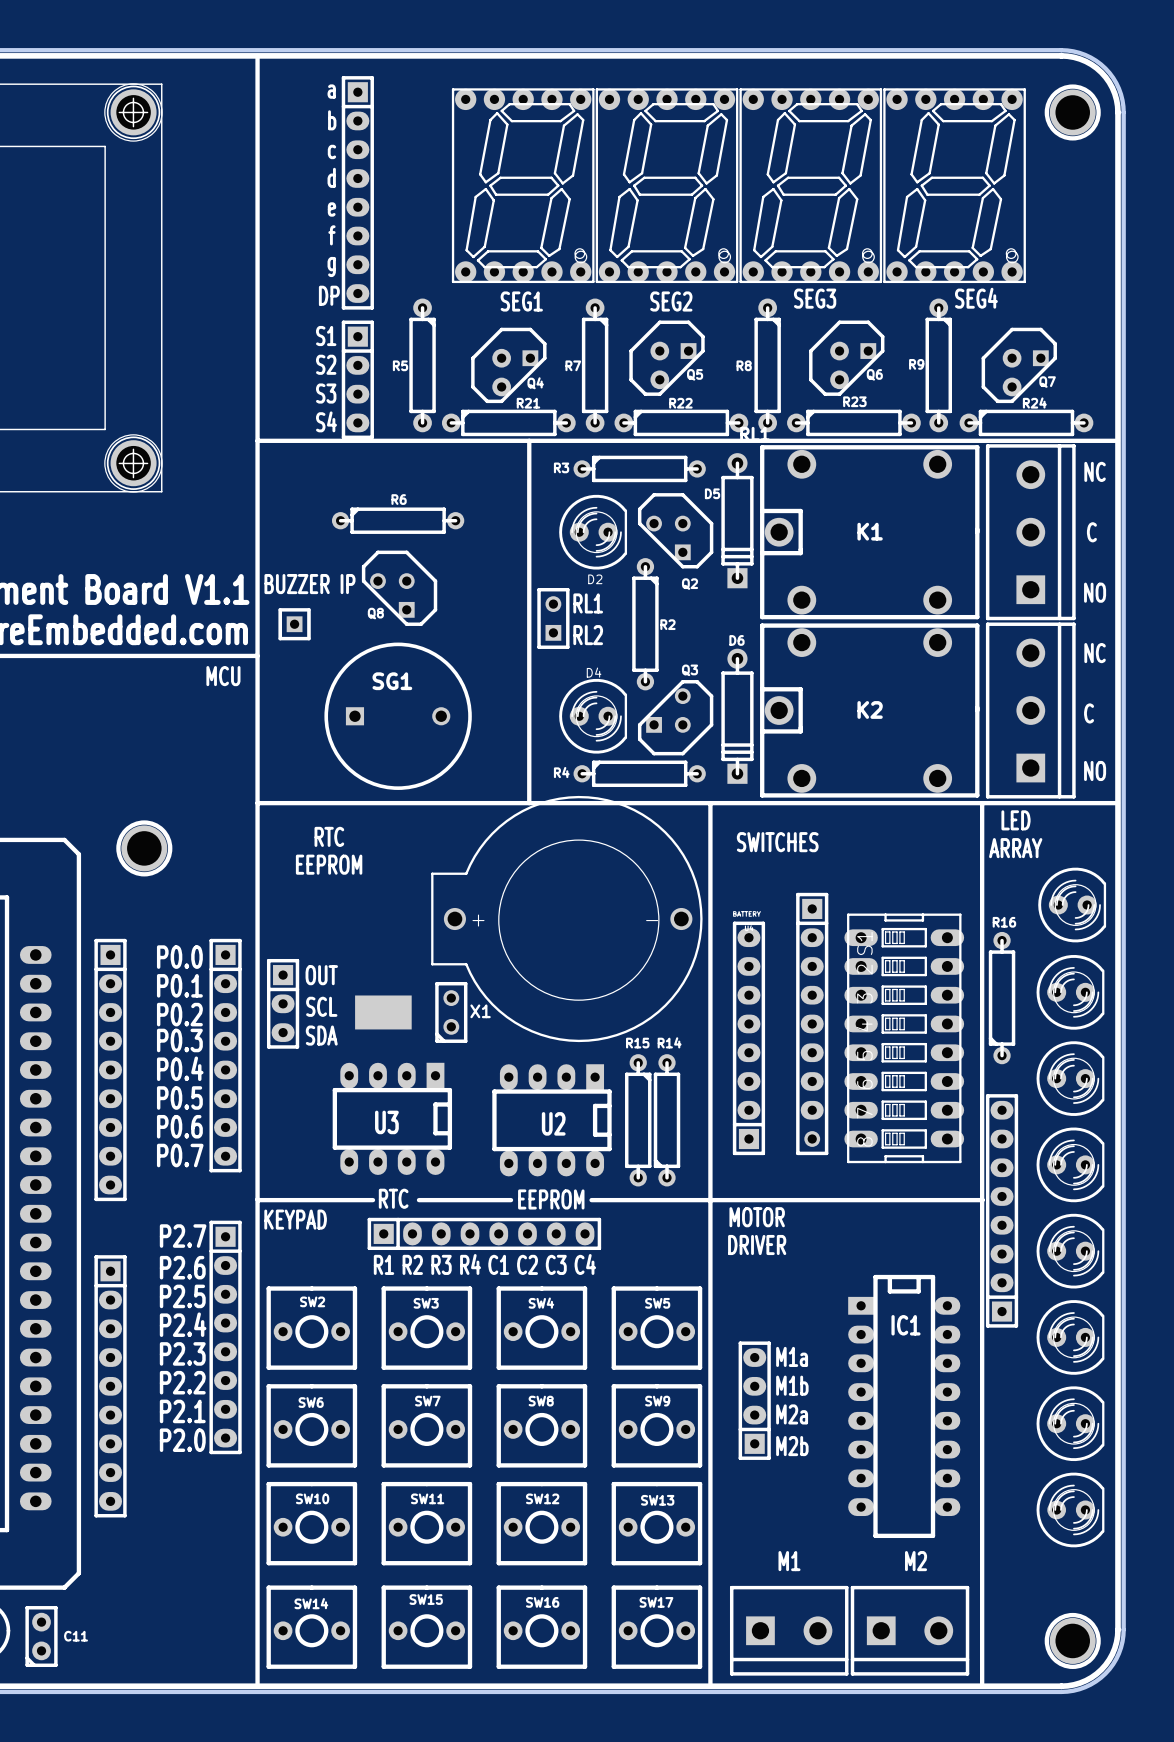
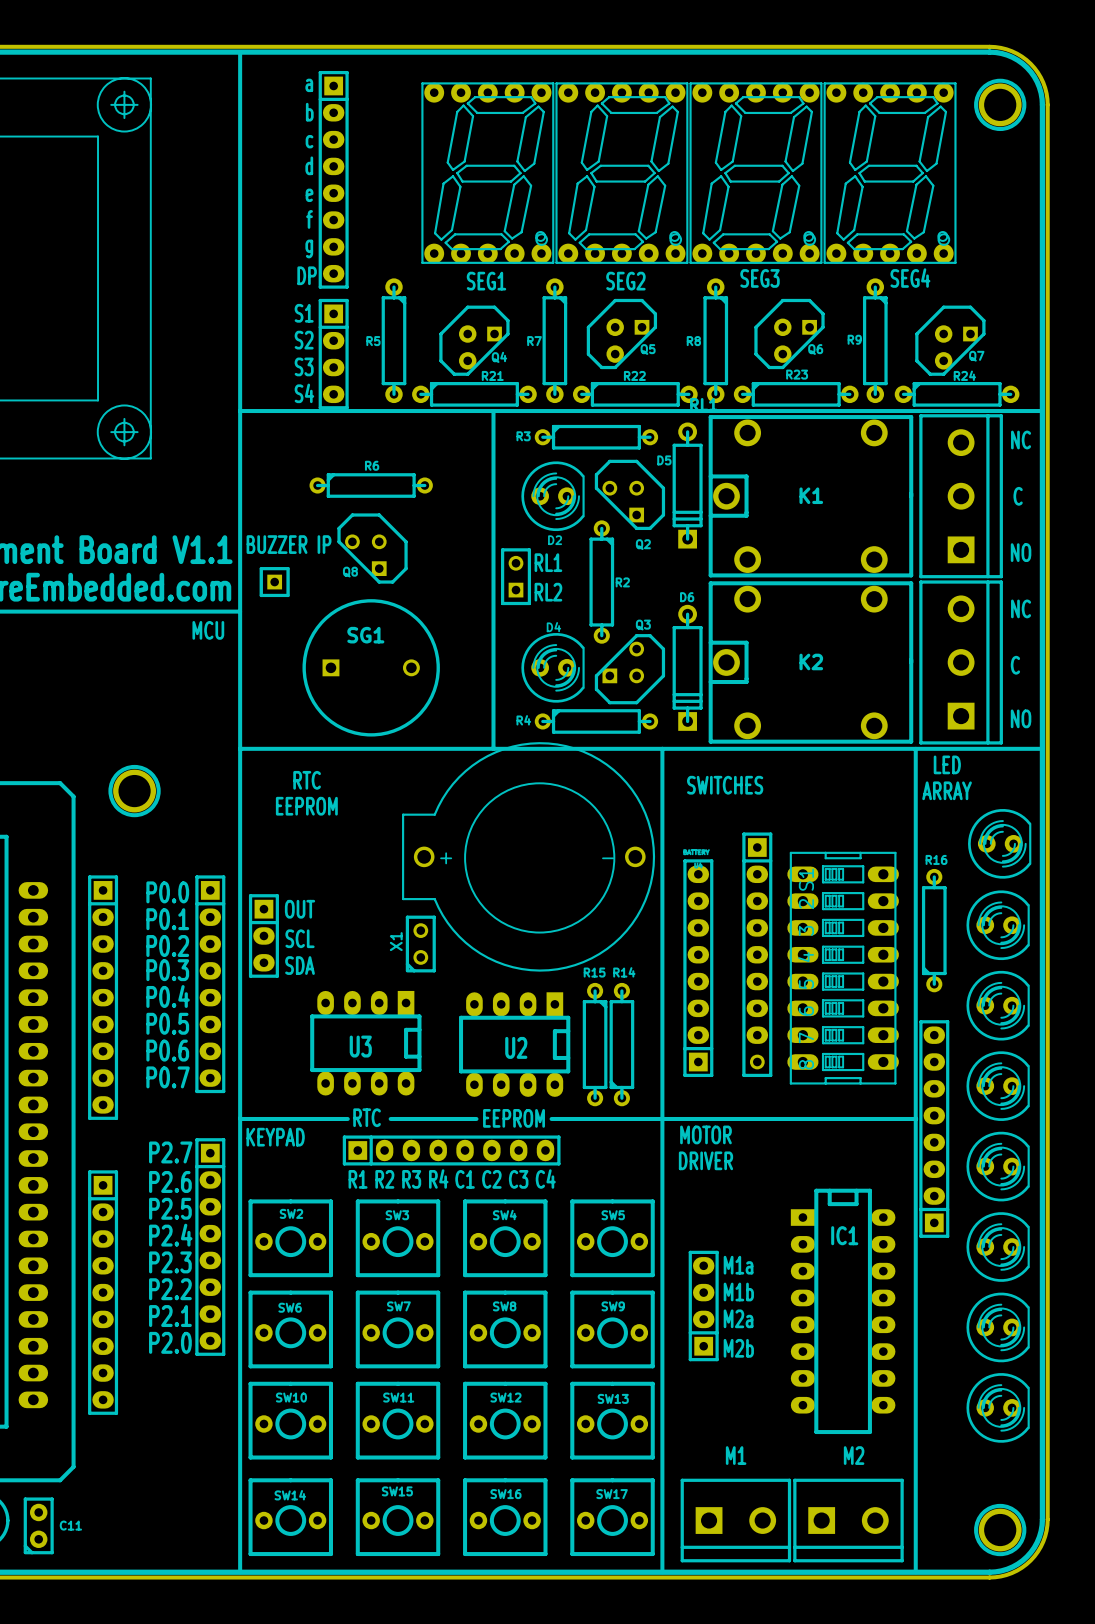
part: (133, 112) -> none
part: (133, 463) -> none
X1 footprint: [355, 981, 468, 1043] -> [405, 915, 436, 973]
X1 name position: X1 (480, 1011) -> X1 (396, 941)

